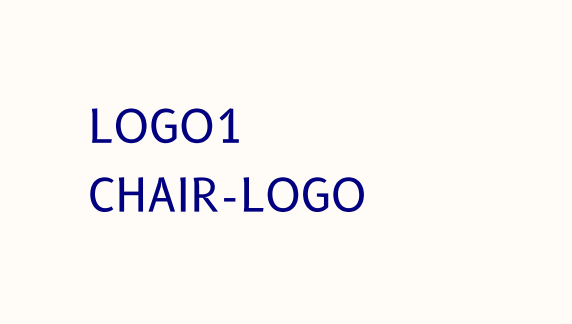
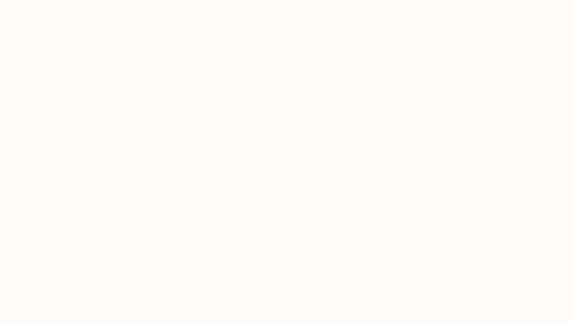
LOGO1: CHAIR-LOGO (227, 160) -> none

